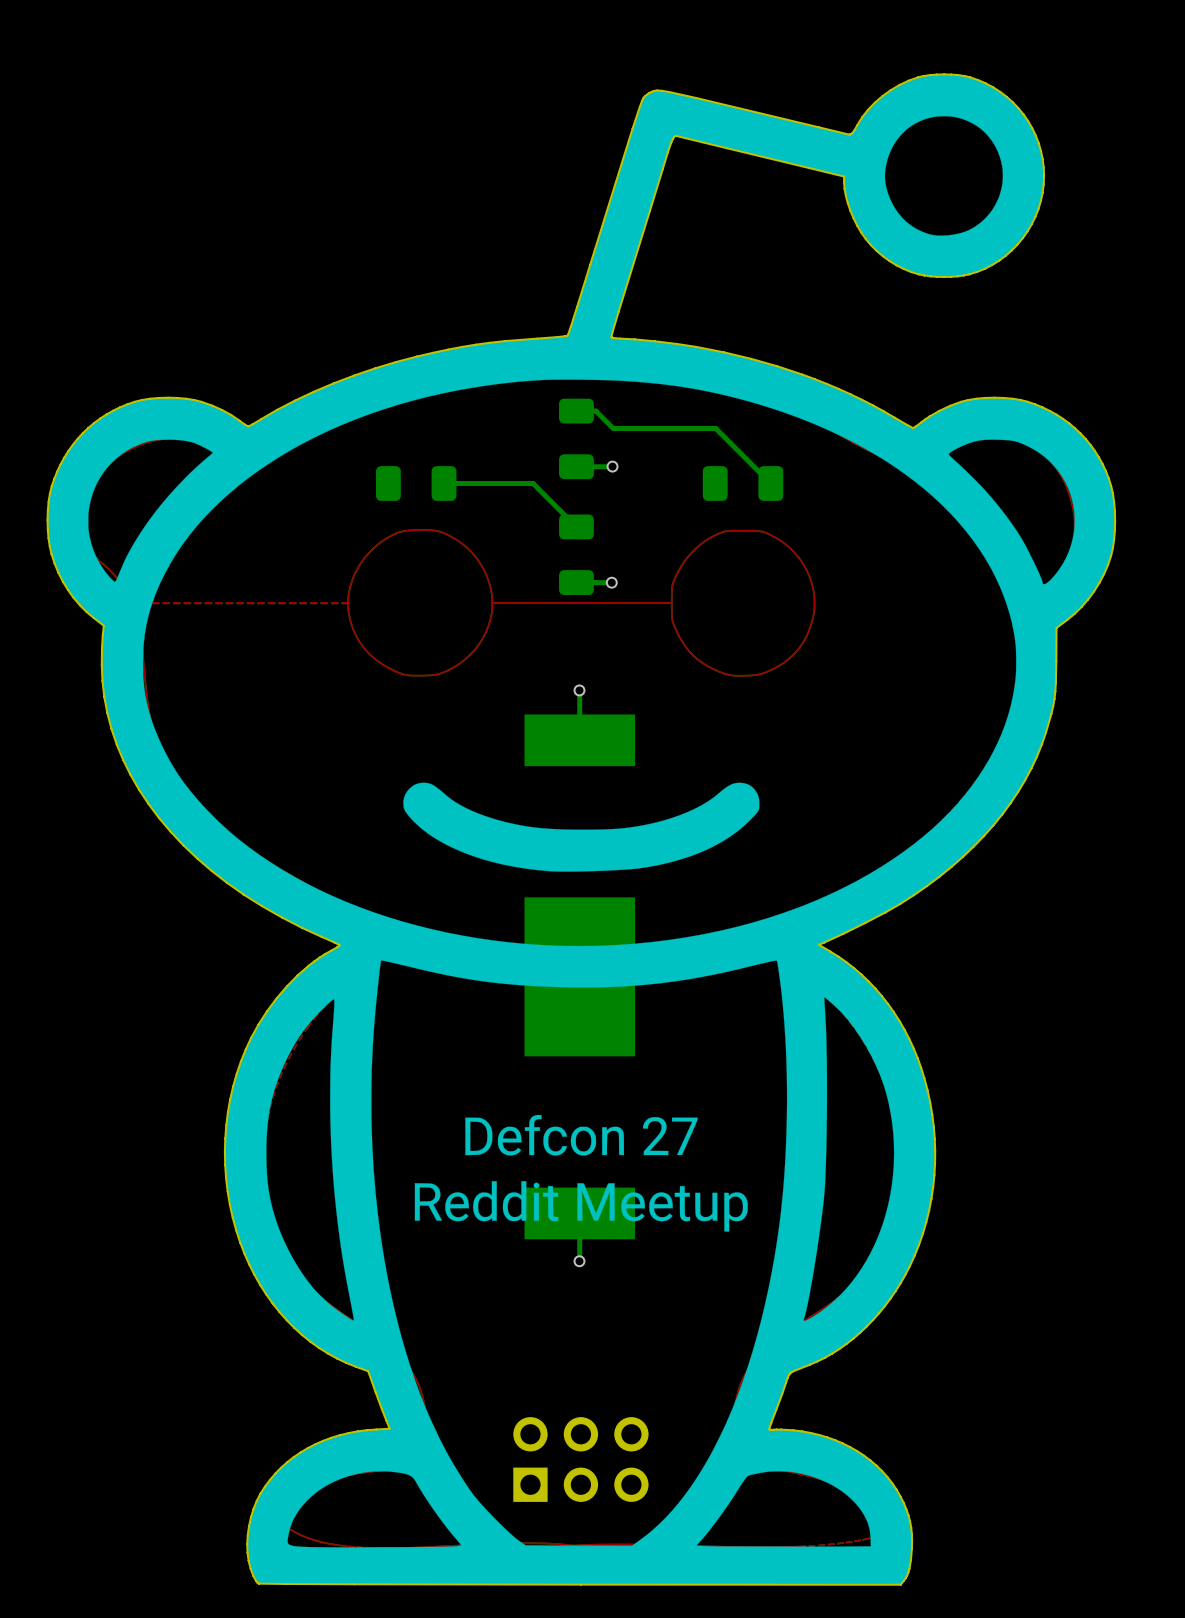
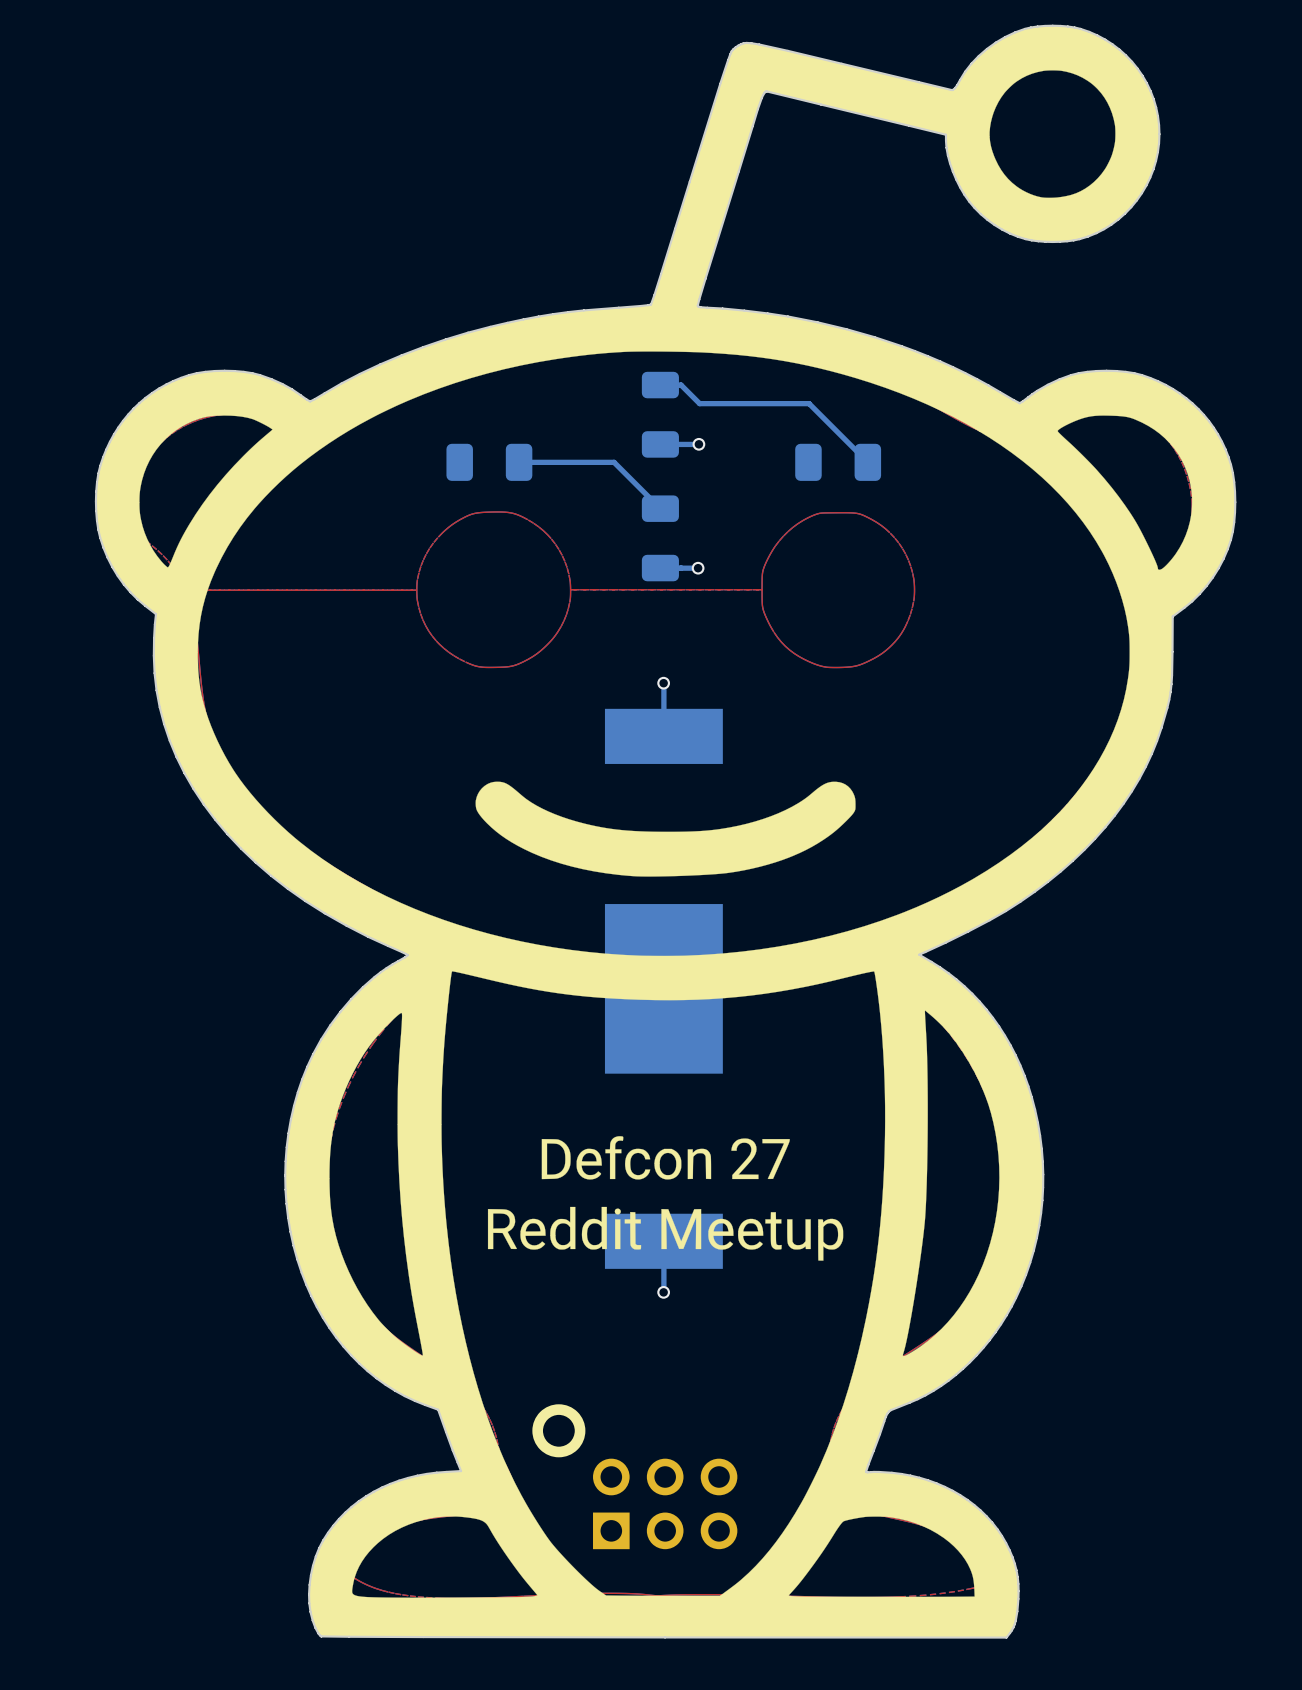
part: none -> (634, 1476)

